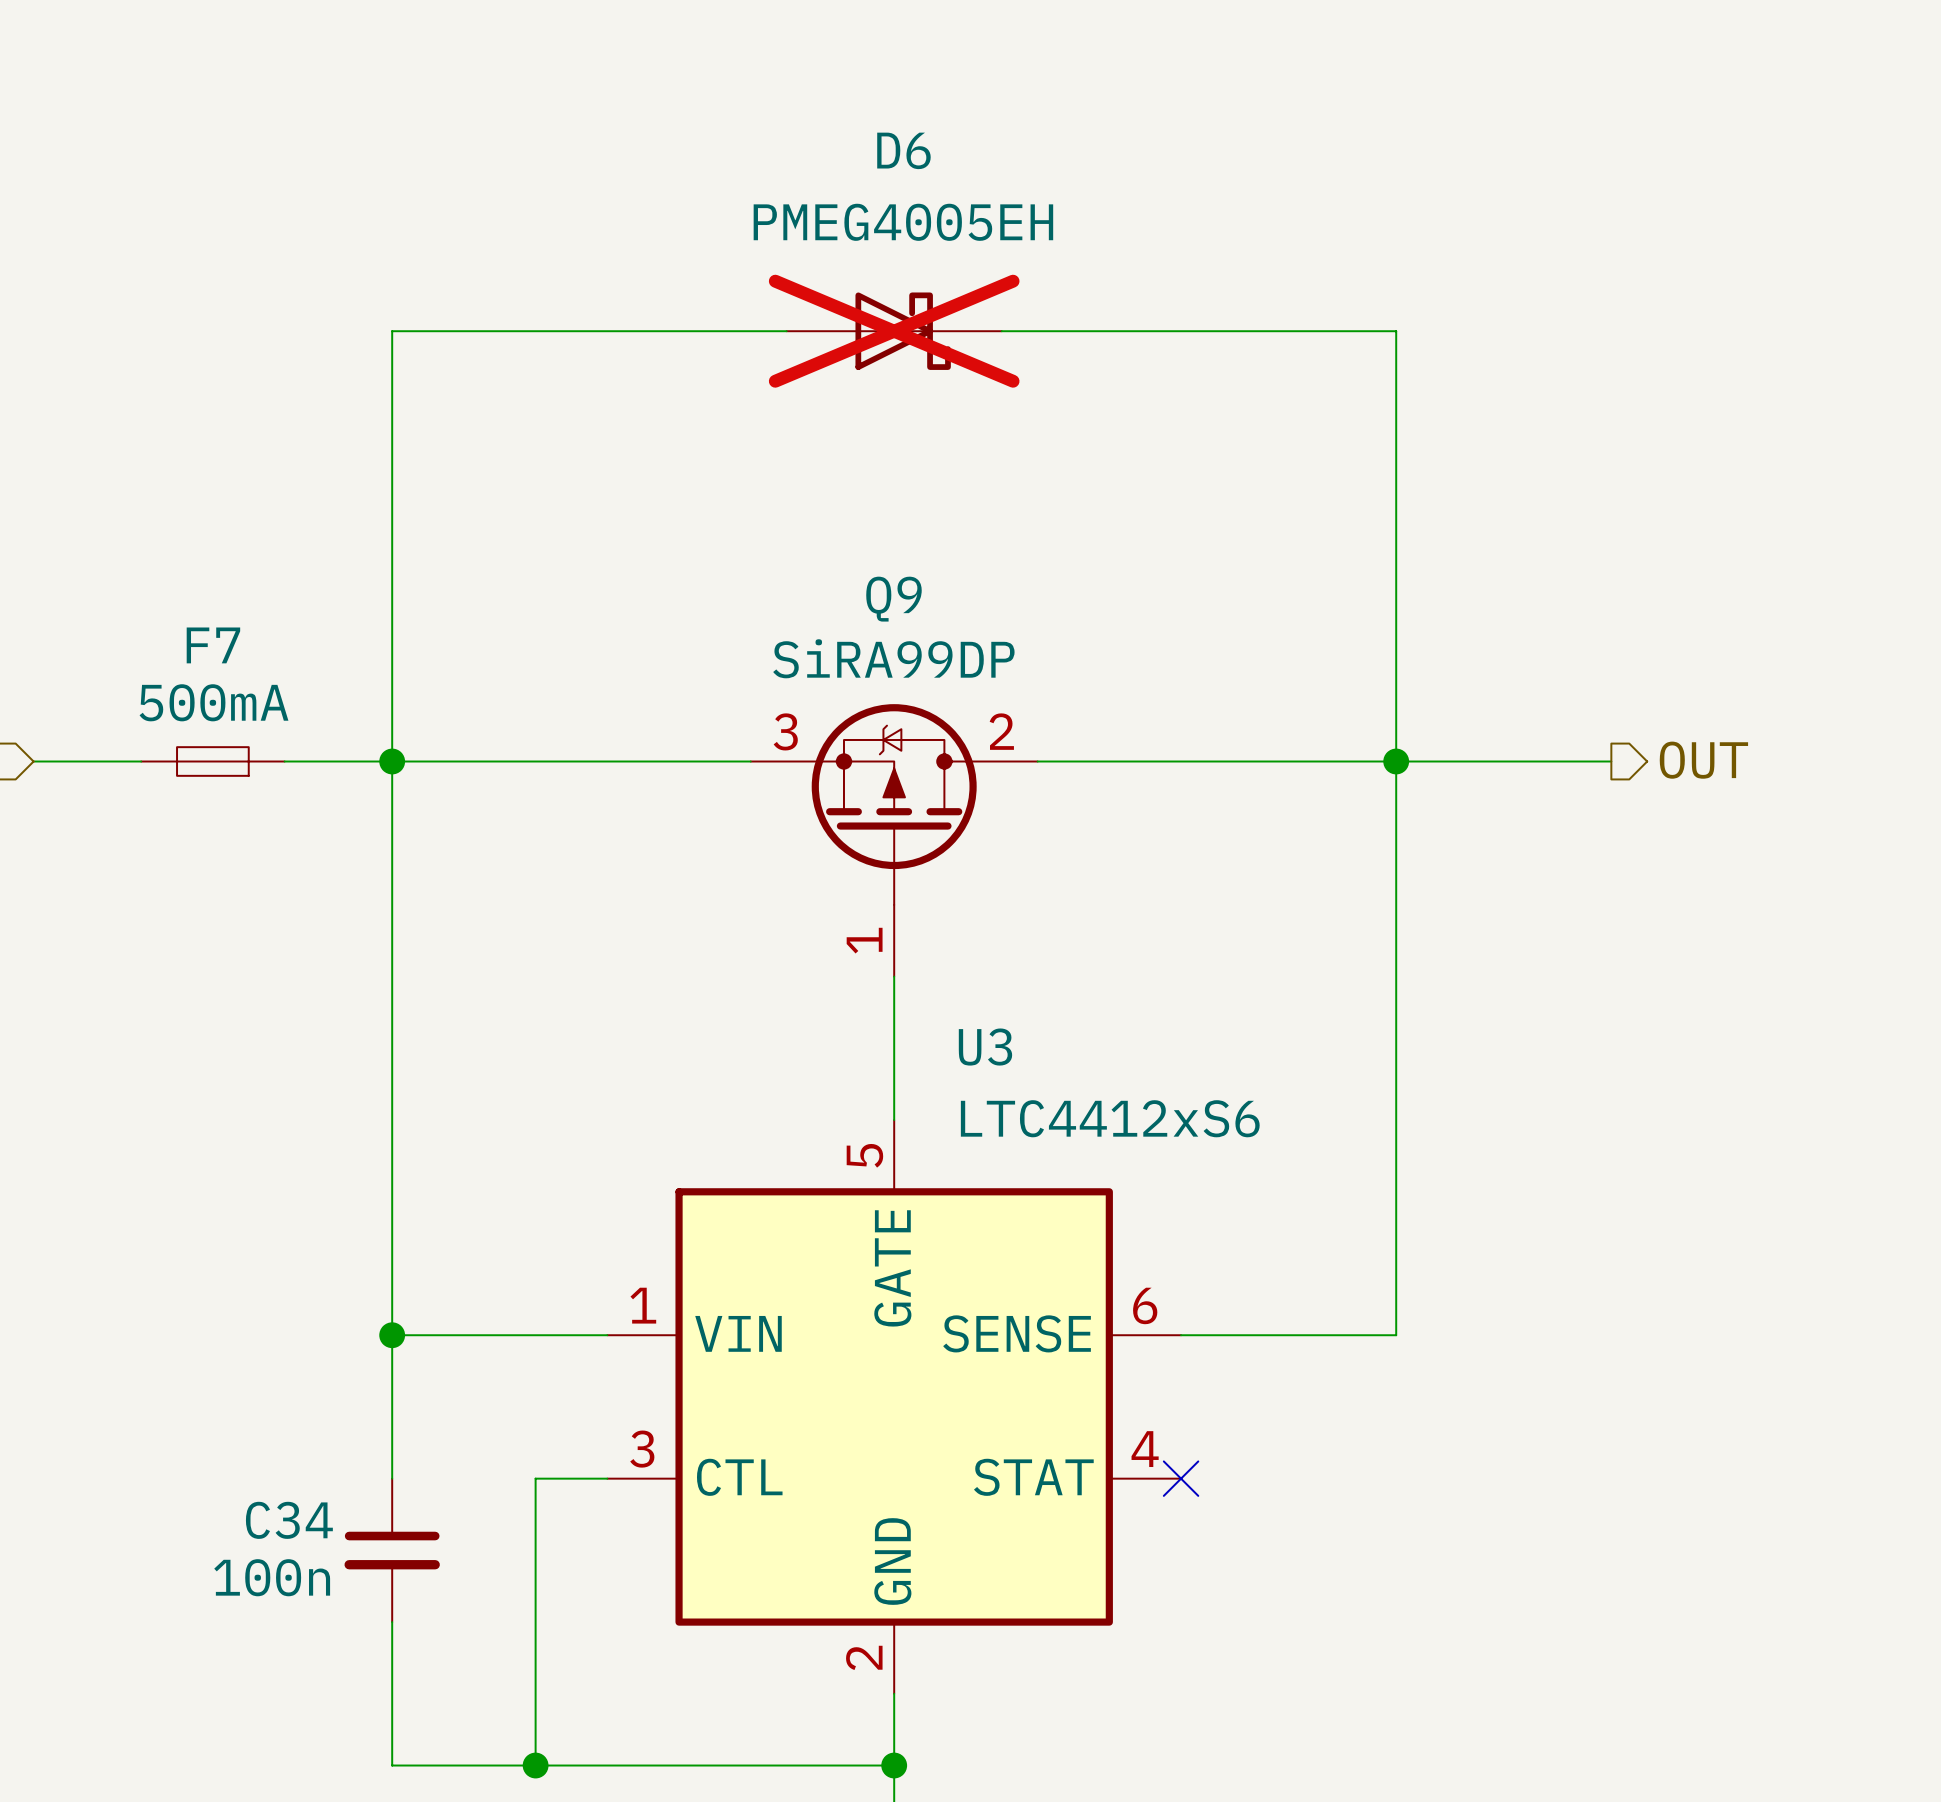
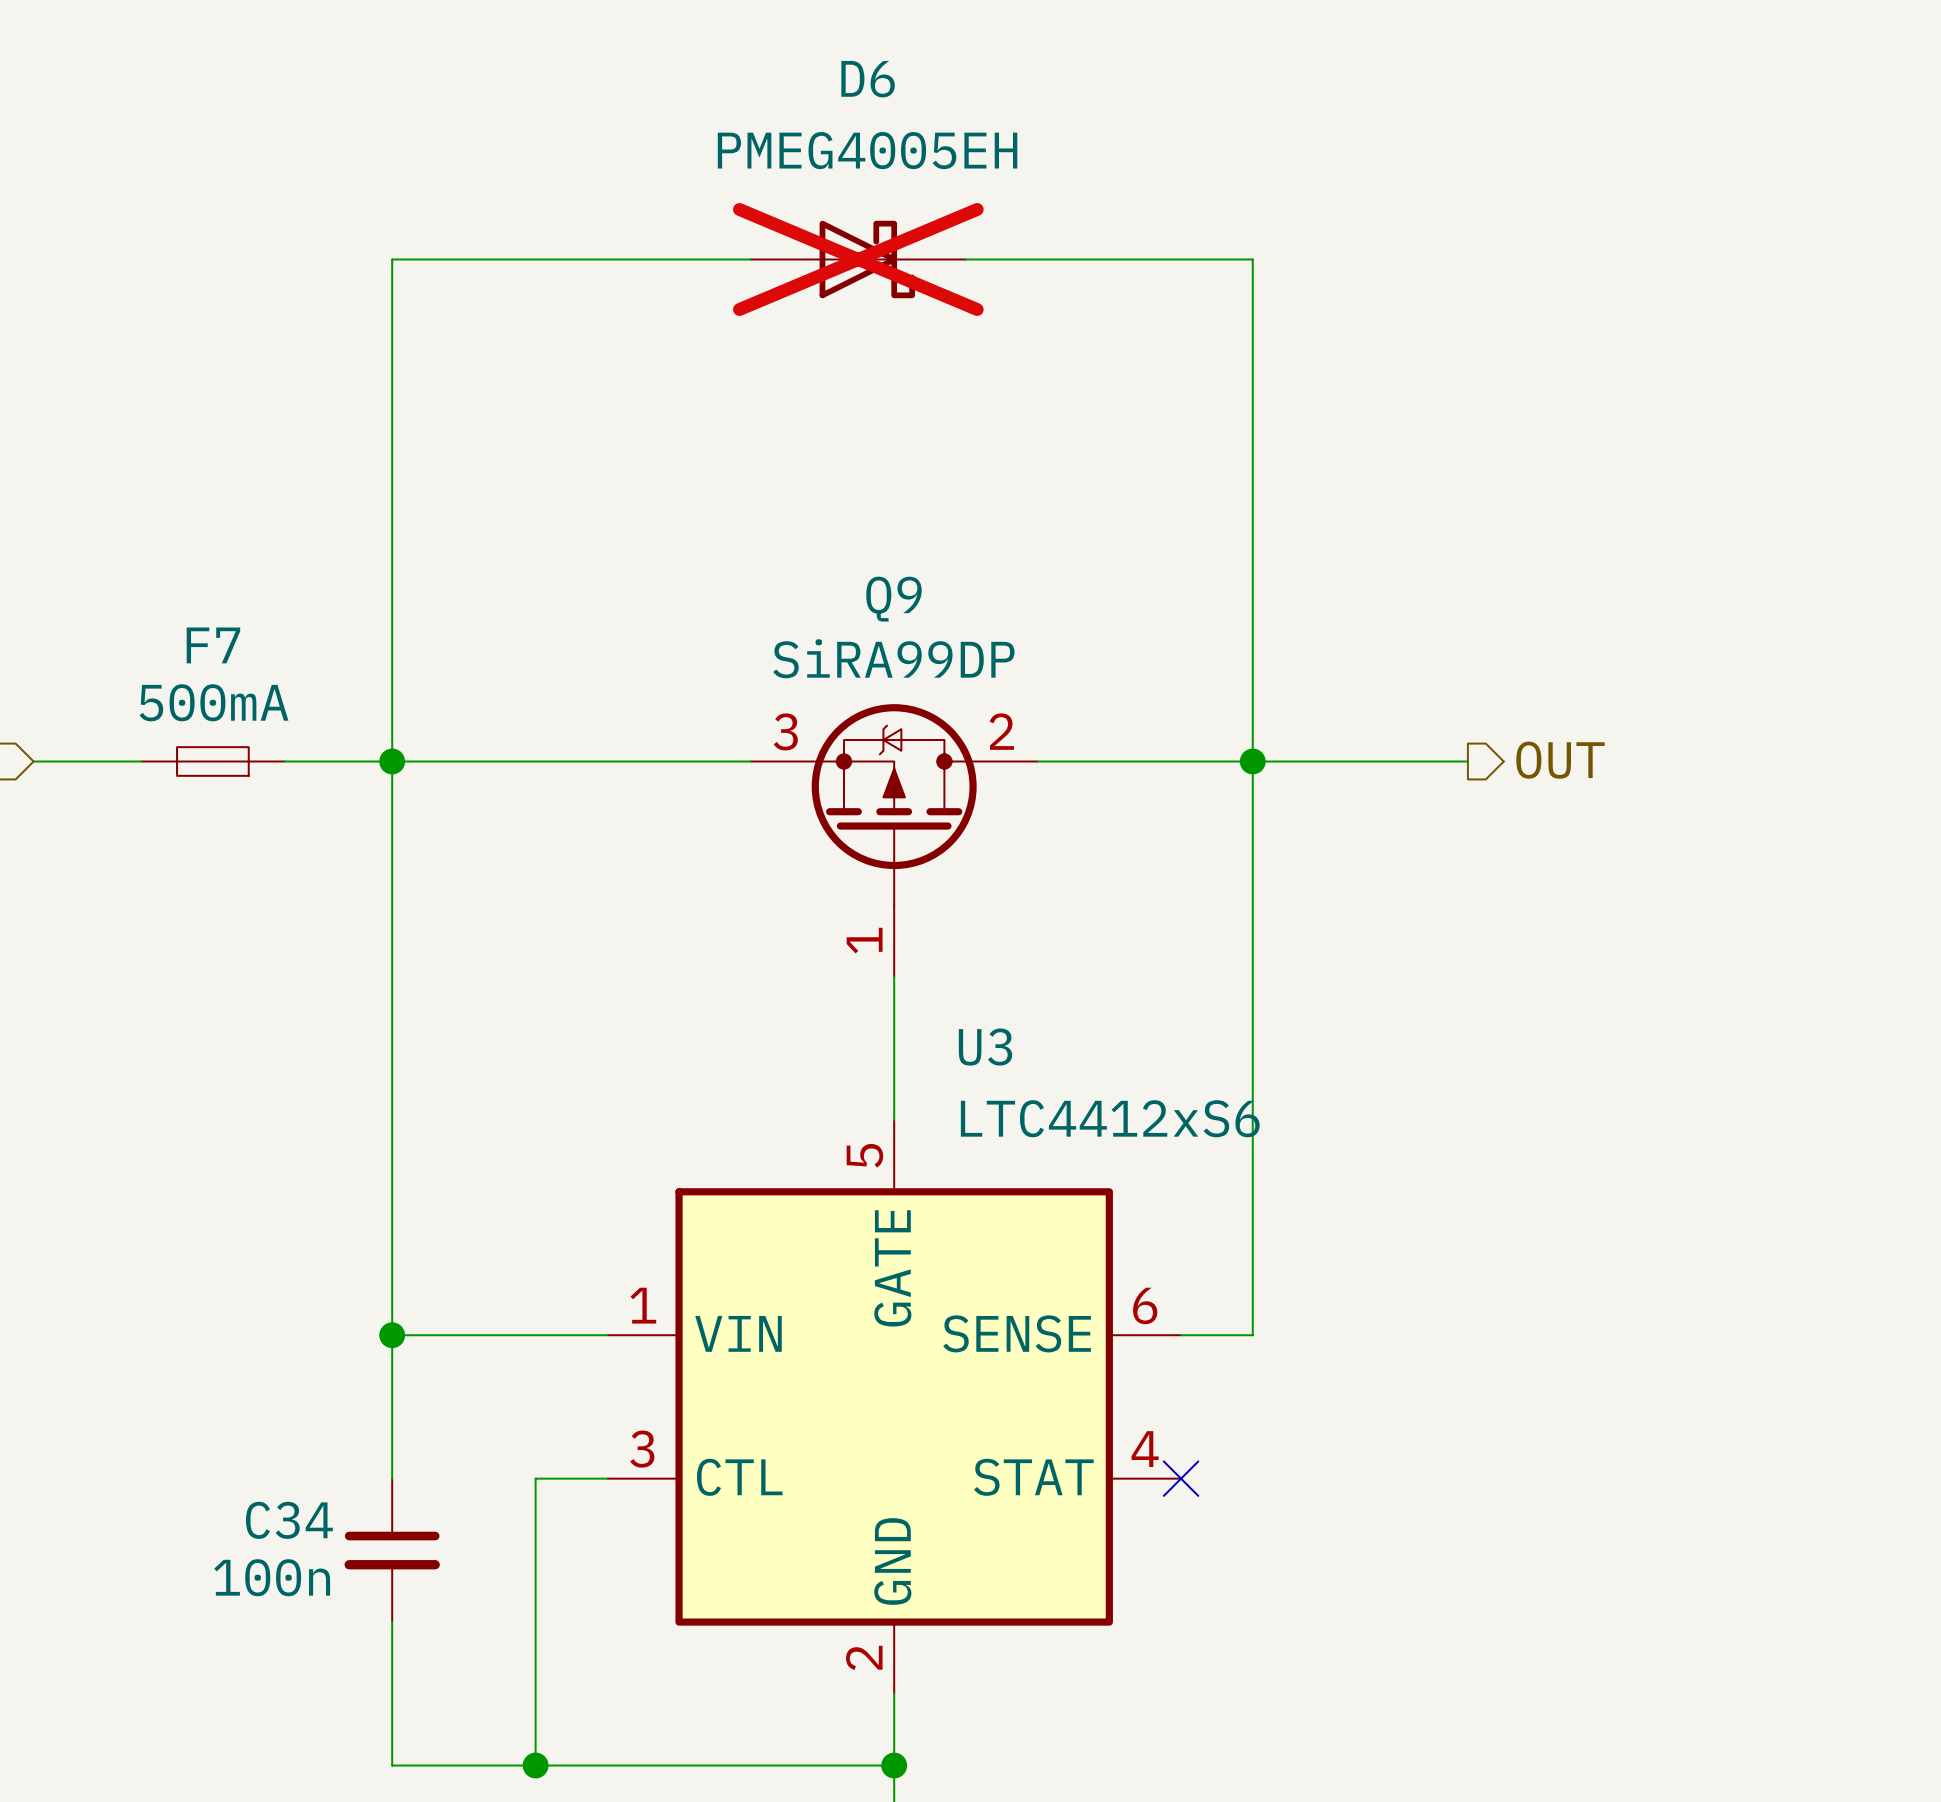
wire: (392, 331) (786, 331) -> (392, 331) (392, 259) (750, 259)
D6 position: (894, 331) -> (858, 259)
wire: (1001, 331) (1396, 331) (1396, 1335) (1252, 1335) -> (965, 259) (1252, 259) (1252, 1335)
hierarchical label position: OUT (1703, 760) -> OUT (1560, 760)
junction position: (1396, 761) -> (1252, 761)
wire: (1467, 761) (1611, 761) -> none

